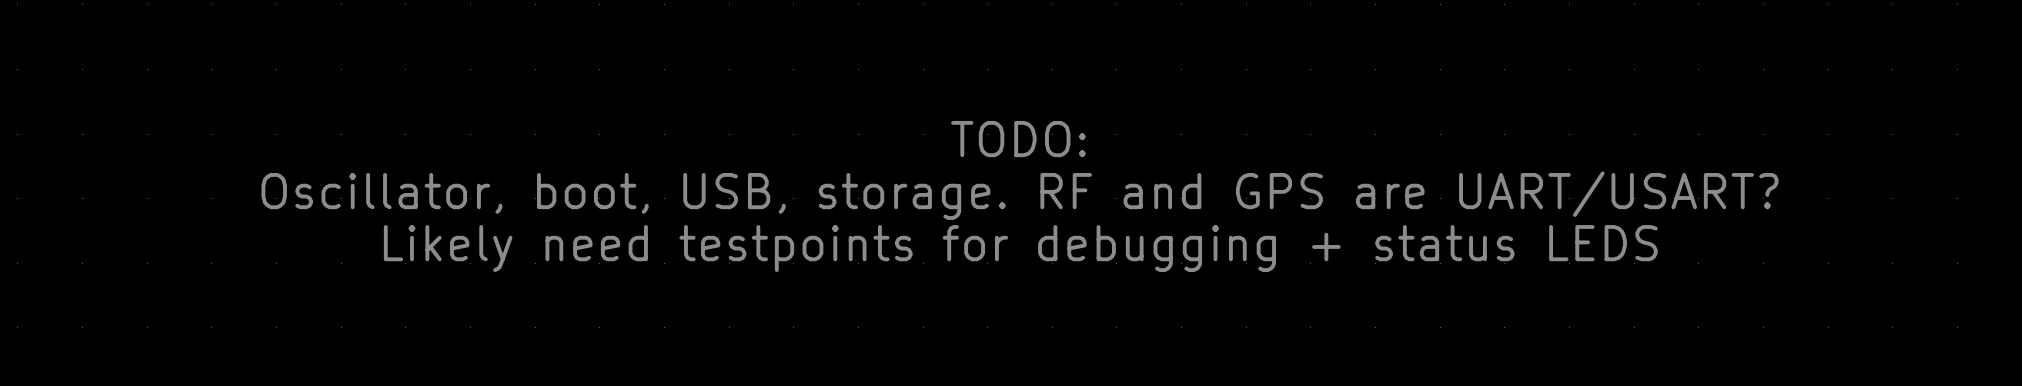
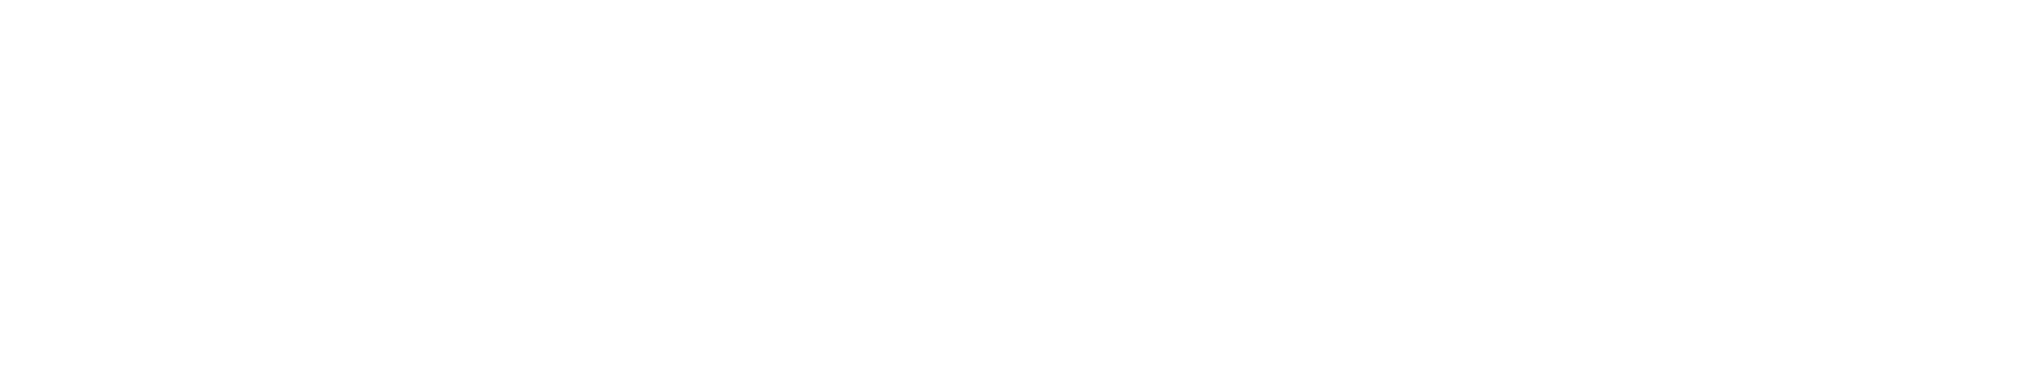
text: TODO: (1018, 139) -> none
text: Oscillator, boot, USB, storage. RF and GPS are UART/USART? (1020, 195) -> none
text: Likely need testpoints for debugging + status LEDS (1020, 248) -> none

